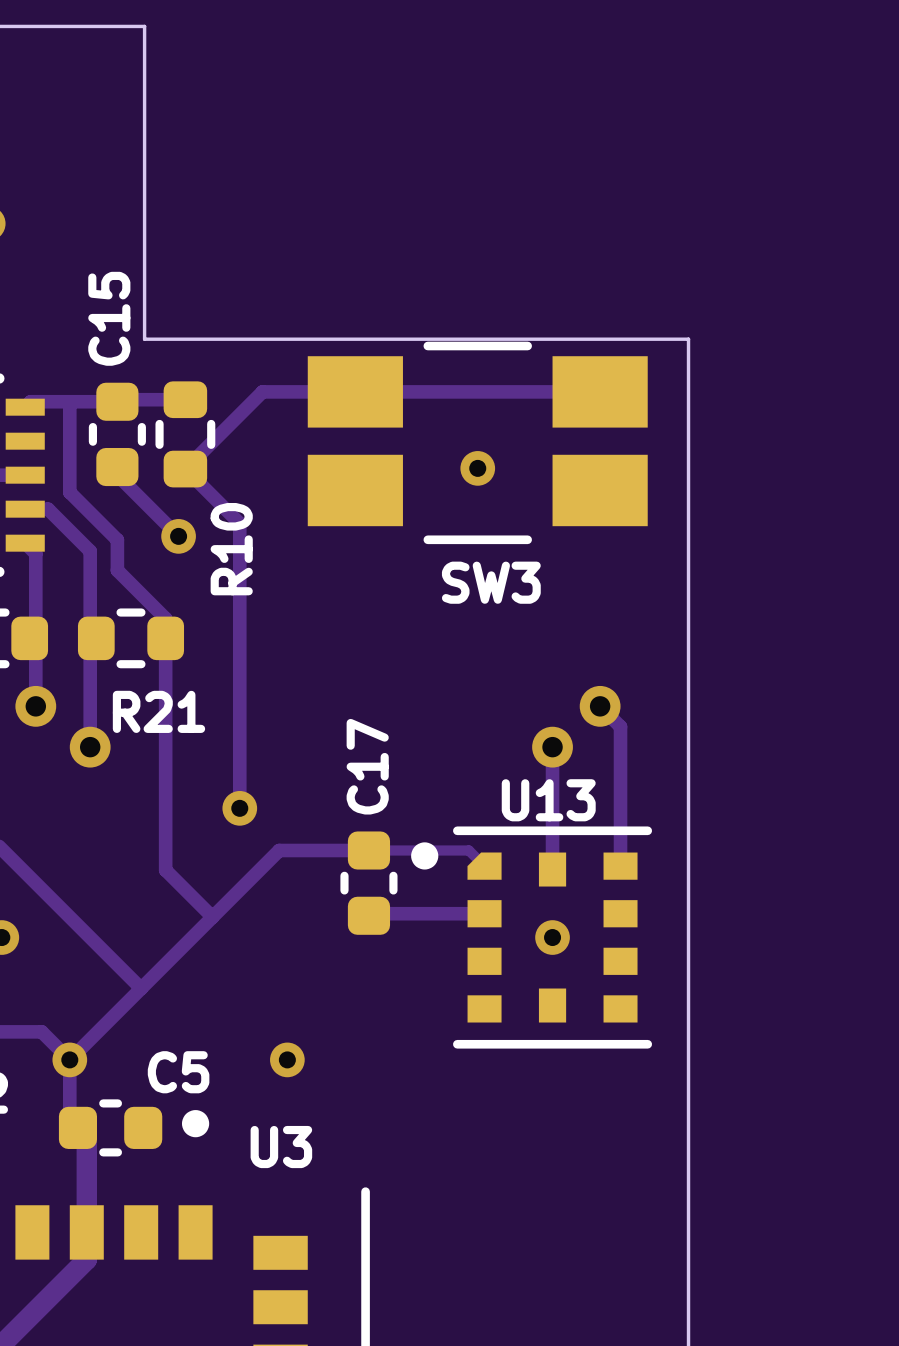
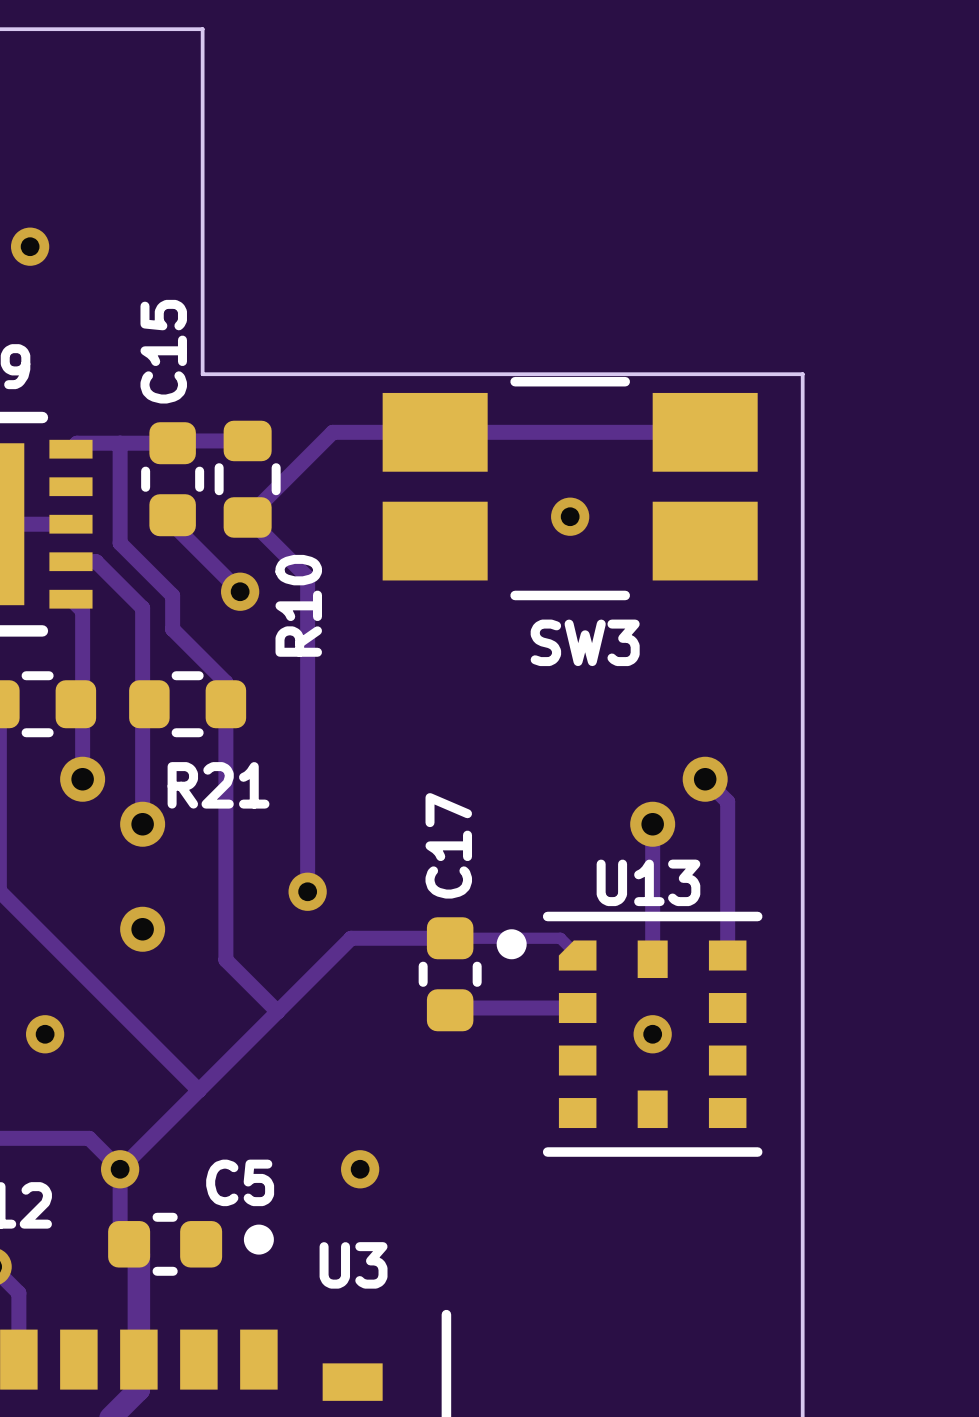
via: none -> (142, 929)

